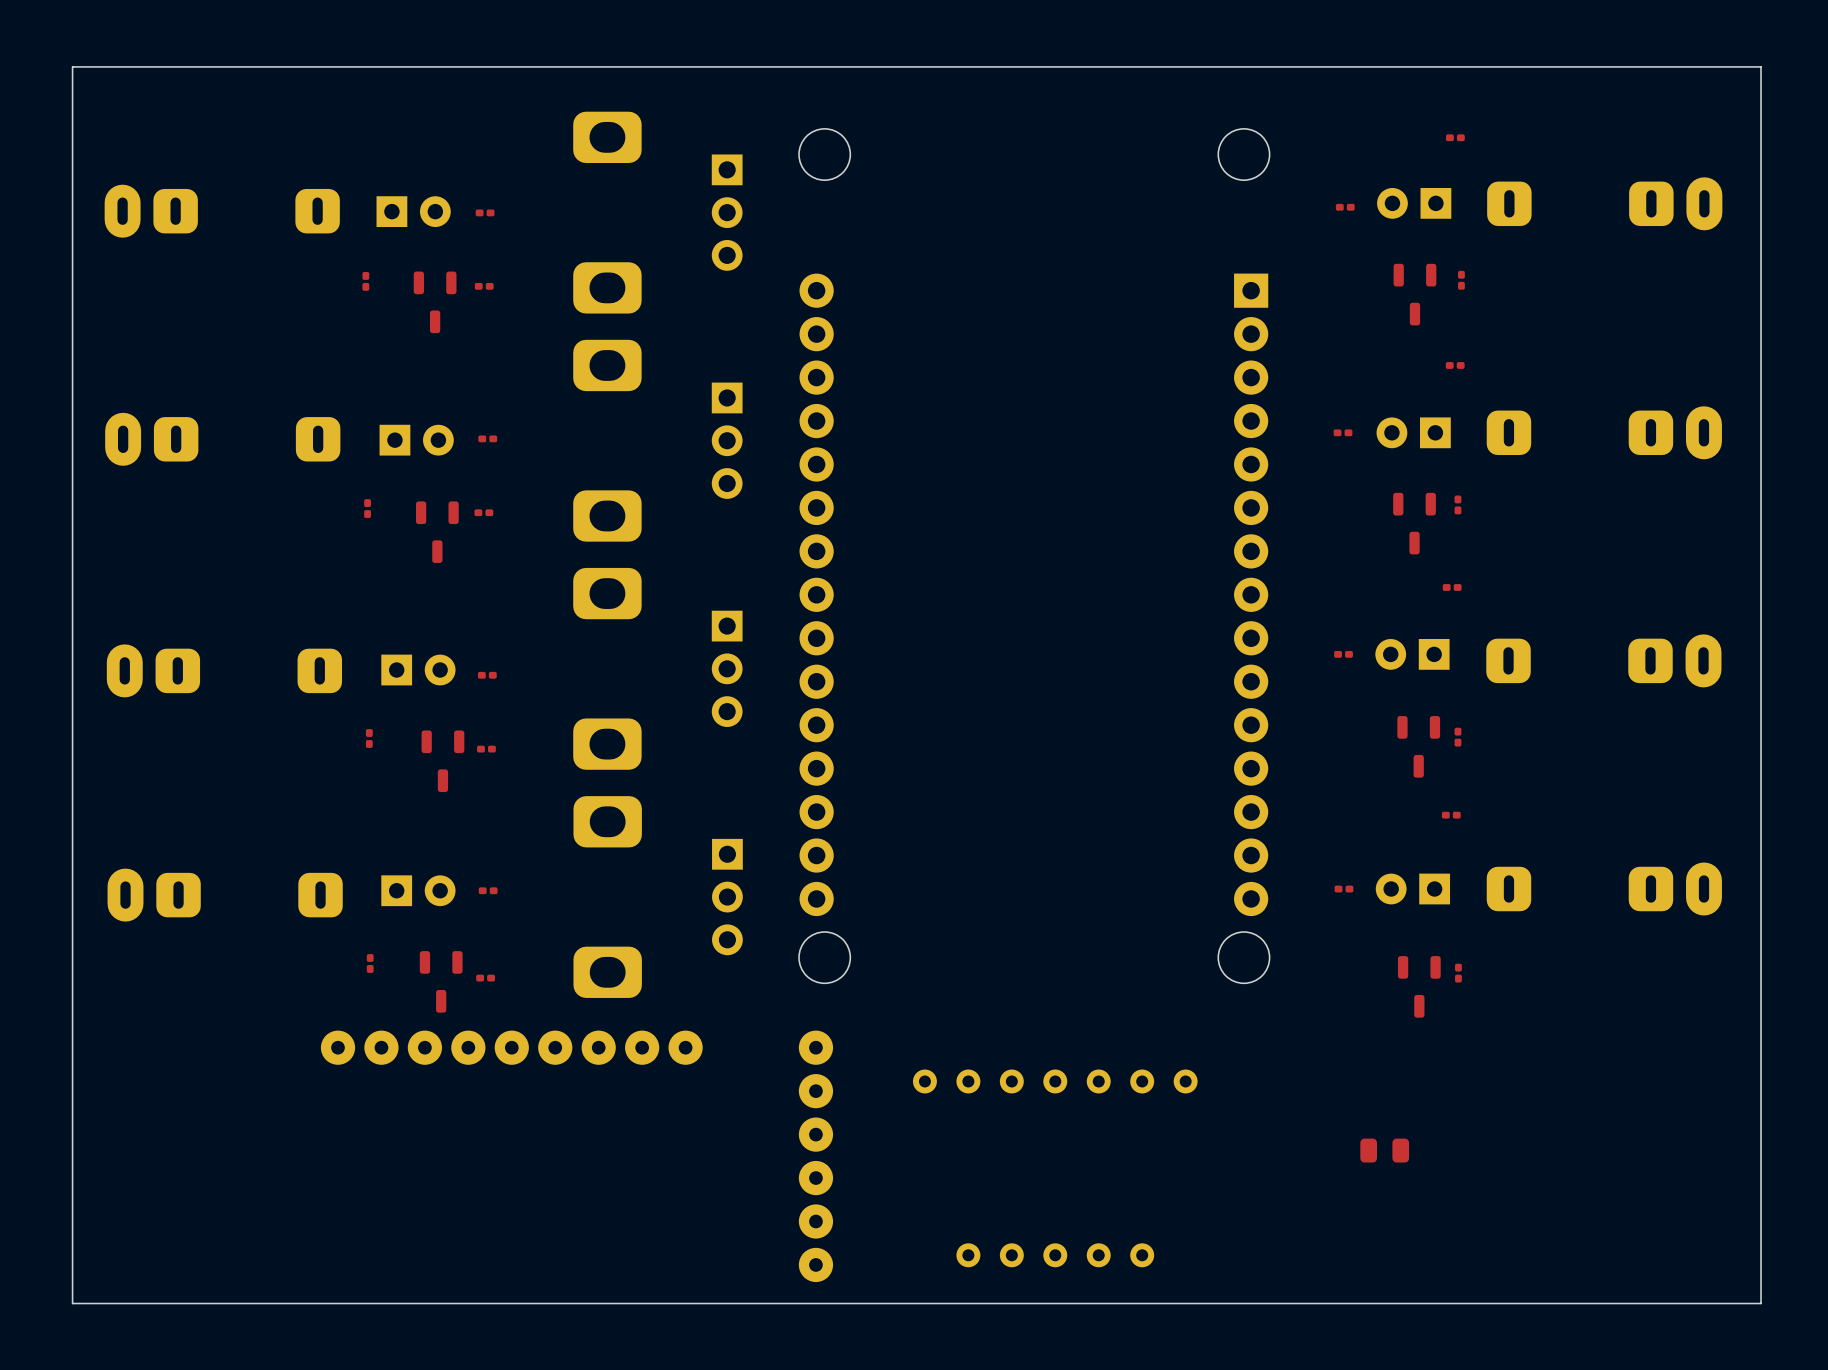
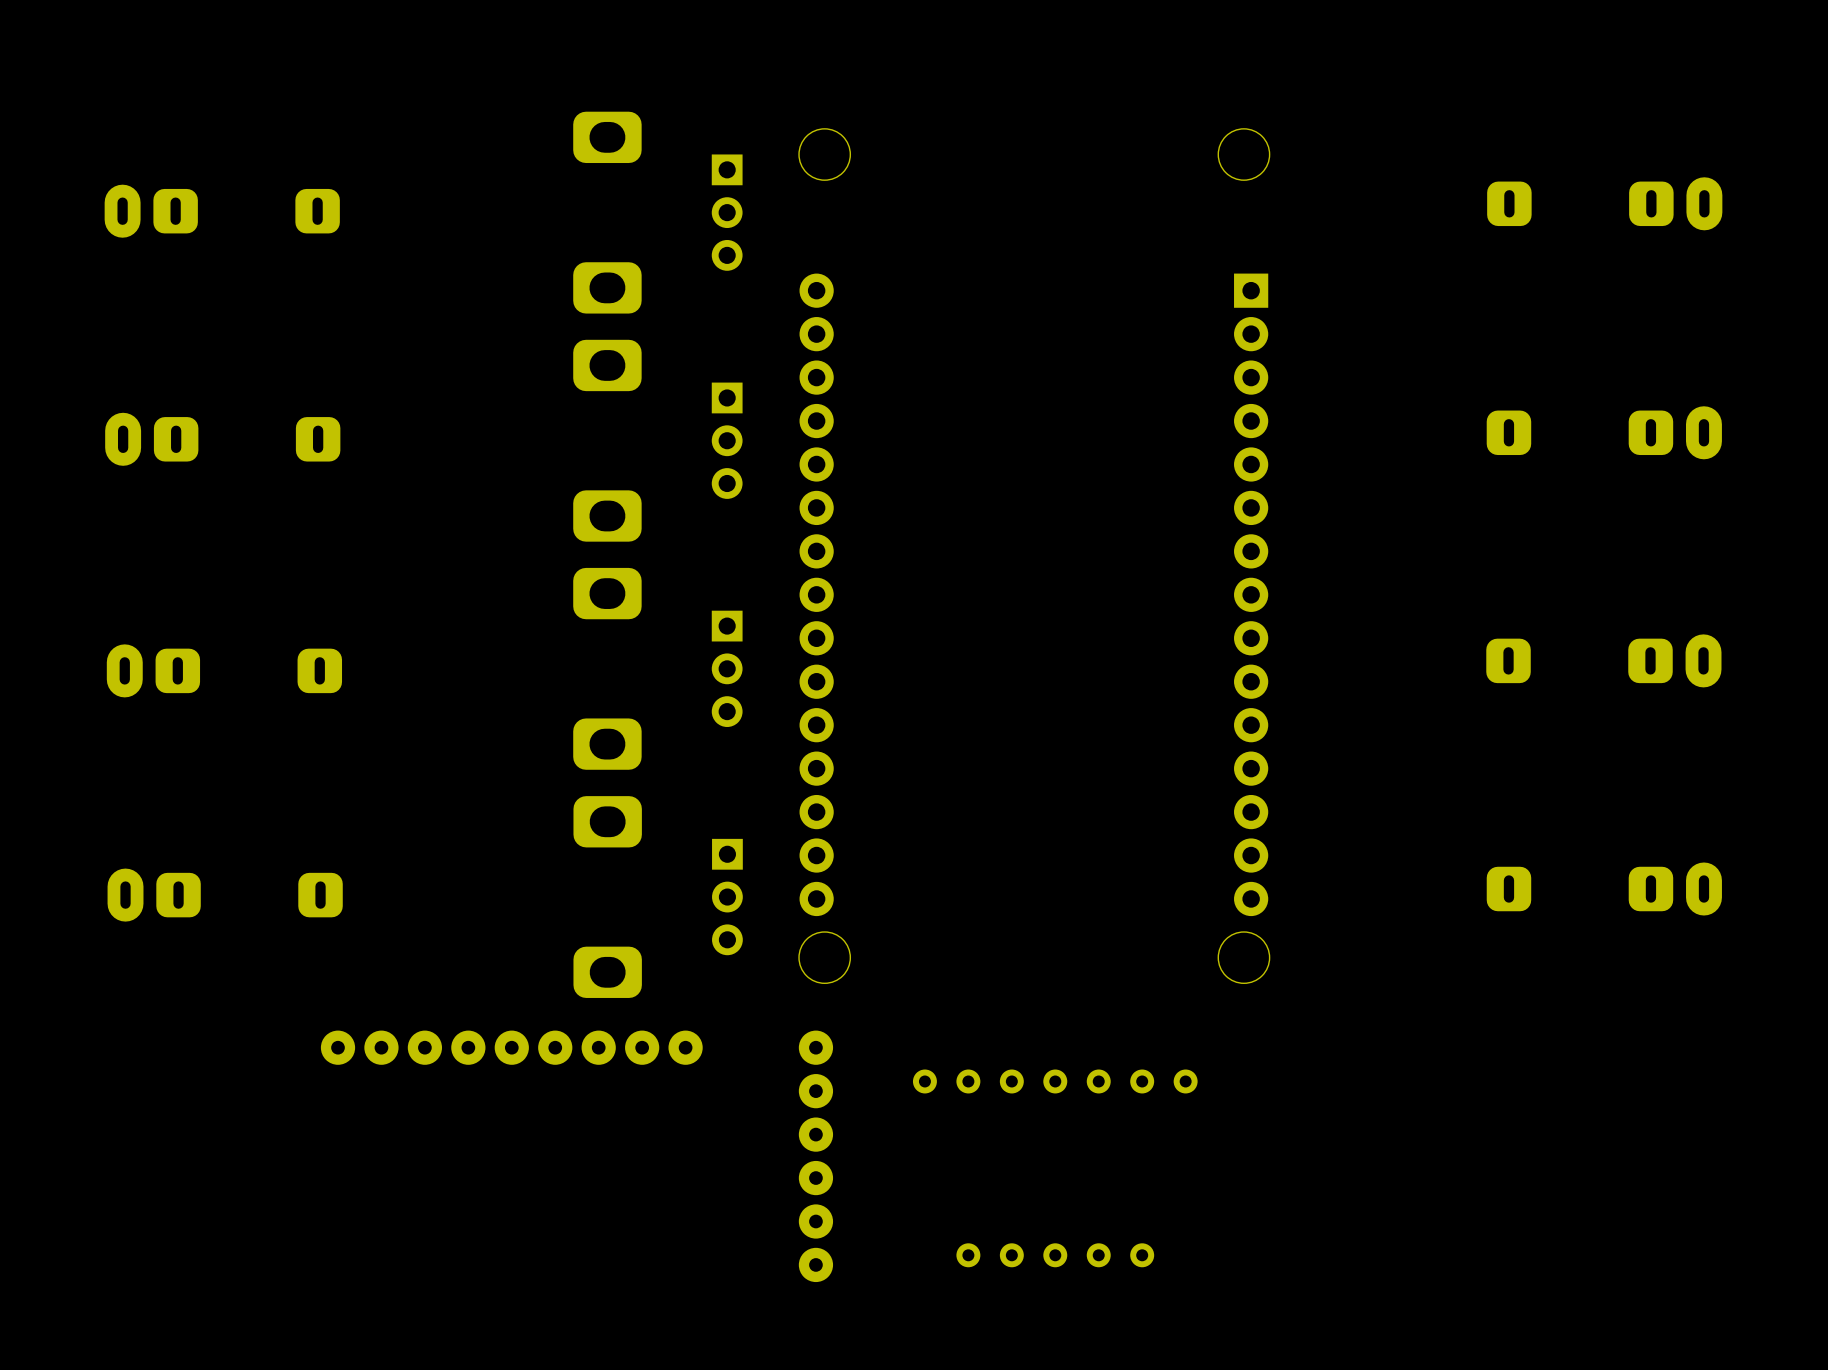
board edge: (1761, 66) (72, 66) (72, 1303) (1761, 1303) (1761, 66) -> none
part: (1455, 137) -> none
part: (1414, 203) -> none
part: (1345, 207) -> none
part: (413, 211) -> none
part: (485, 212) -> none
part: (1461, 280) -> none
part: (365, 281) -> none
part: (484, 286) -> none
part: (1414, 294) -> none
part: (435, 302) -> none
part: (1455, 365) -> none
part: (1343, 432) -> none
part: (1413, 432) -> none
part: (487, 438) -> none
part: (416, 440) -> none
part: (1457, 504) -> none
part: (367, 508) -> none
part: (483, 512) -> none
part: (1414, 523) -> none
part: (437, 532) -> none
part: (1452, 587) -> none
part: (1343, 654) -> none
part: (1412, 654) -> none
part: (418, 670) -> none
part: (487, 675) -> none
part: (1457, 737) -> none
part: (369, 738) -> none
part: (1418, 746) -> none
part: (486, 749) -> none
part: (442, 761) -> none
part: (1451, 815) -> none
part: (1343, 889) -> none
part: (1412, 889) -> none
part: (418, 890) -> none
part: (488, 890) -> none
part: (370, 963) -> none
part: (1458, 973) -> none
part: (485, 978) -> none
part: (441, 981) -> none
part: (1419, 986) -> none
part: (1384, 1150) -> none

